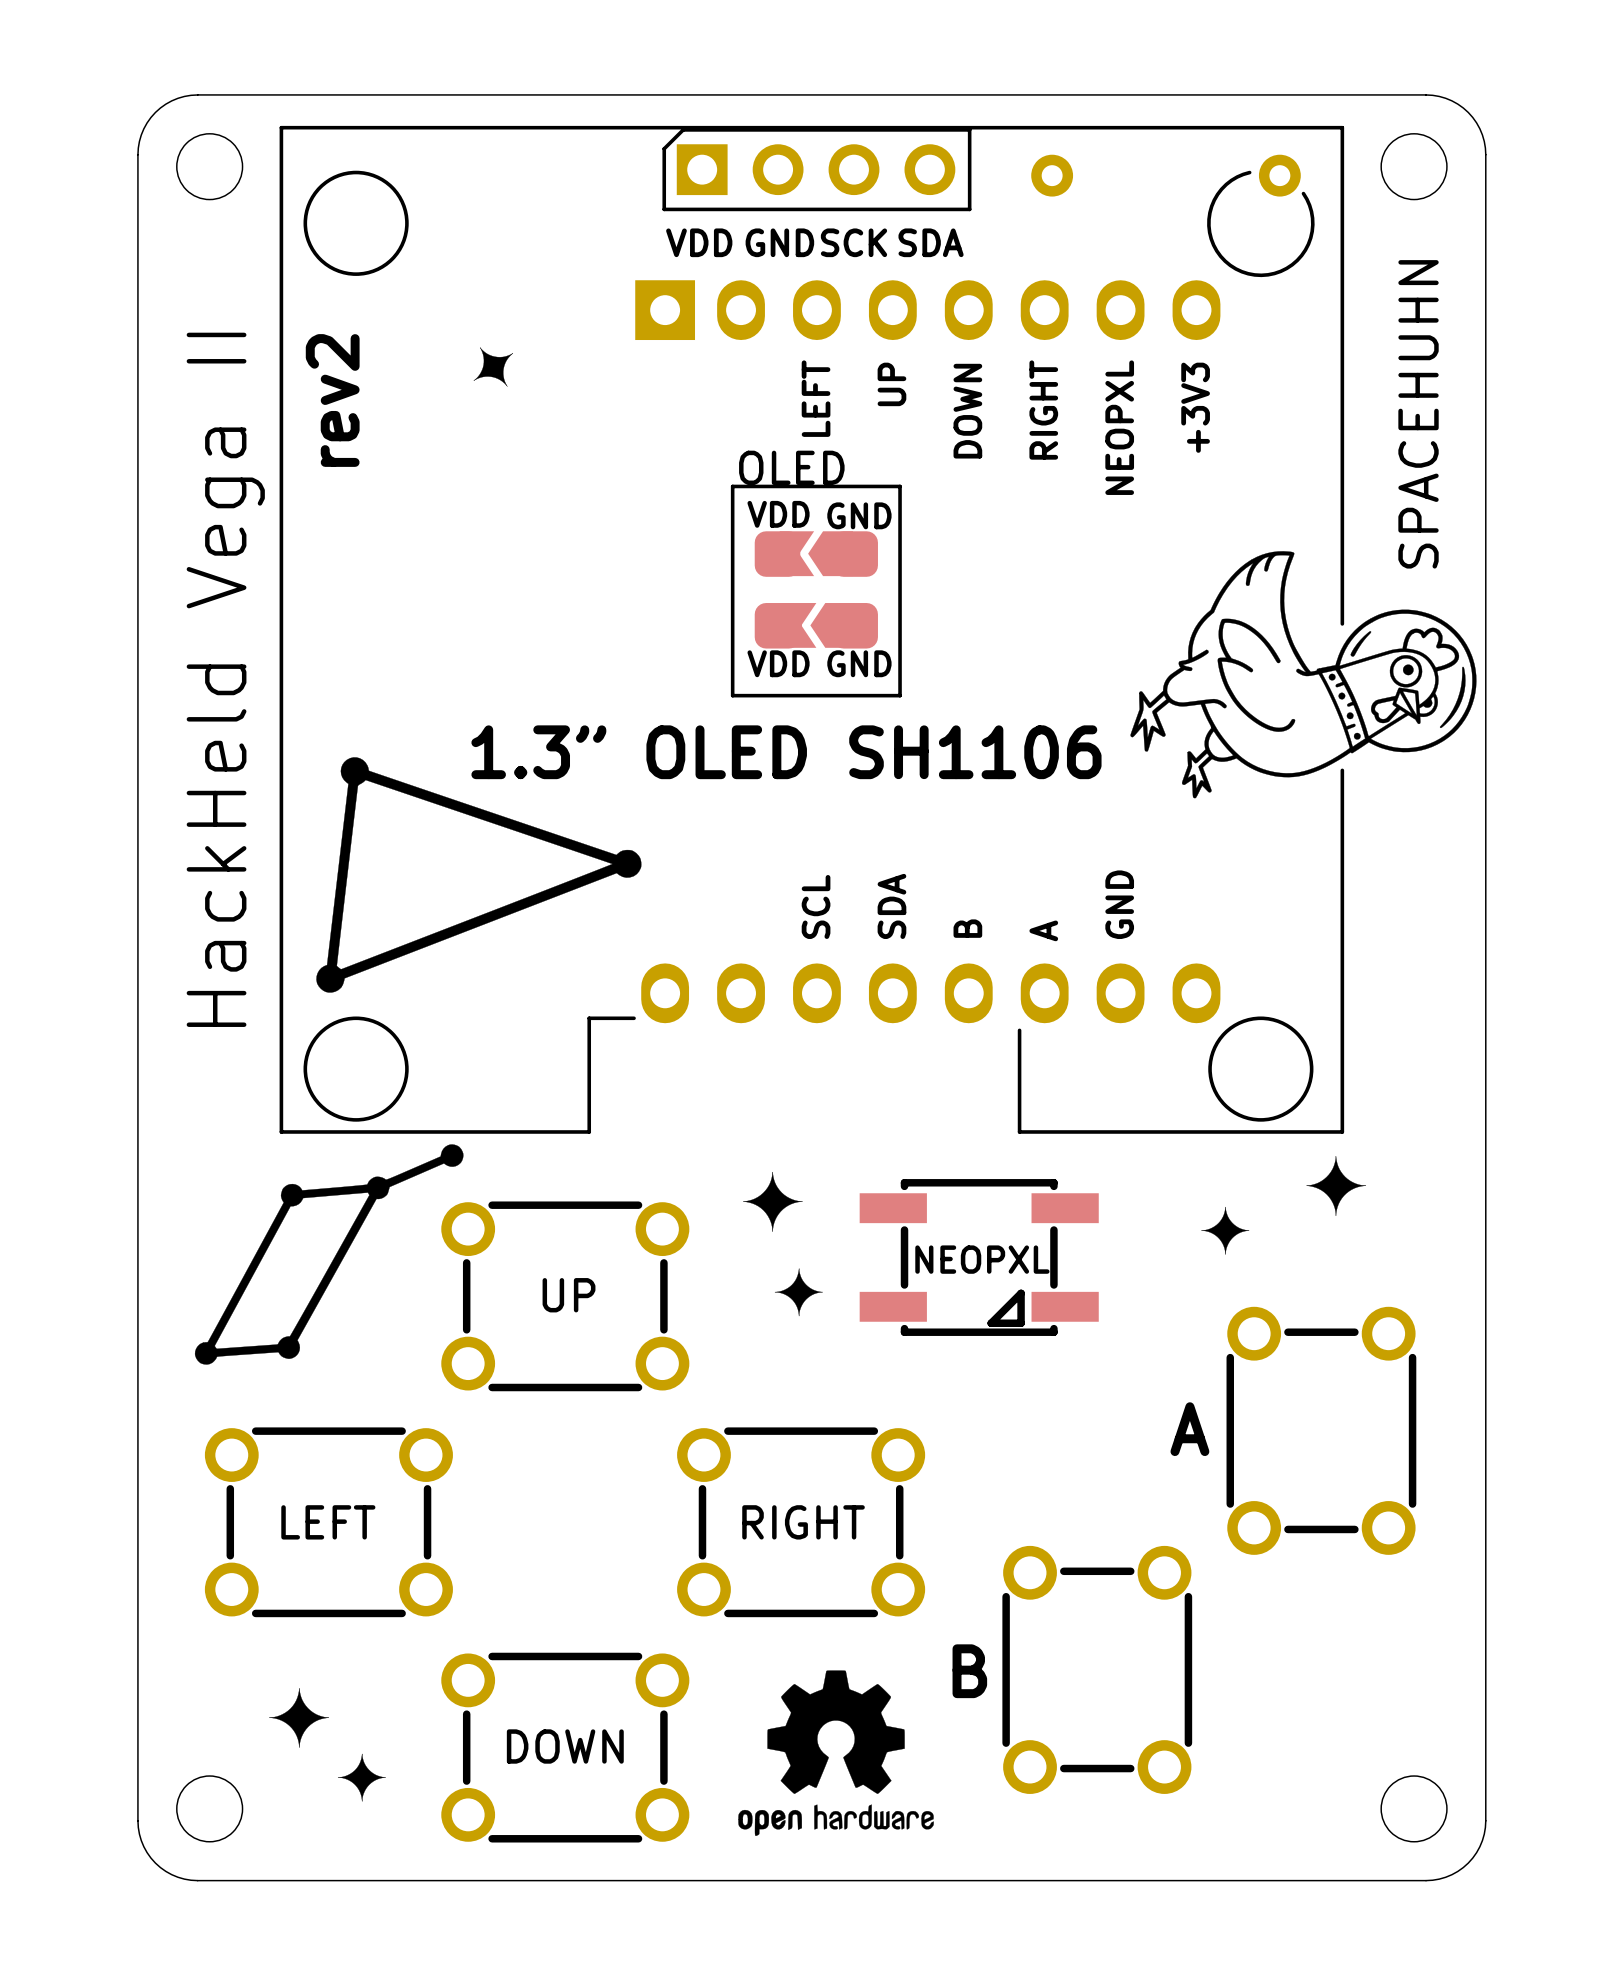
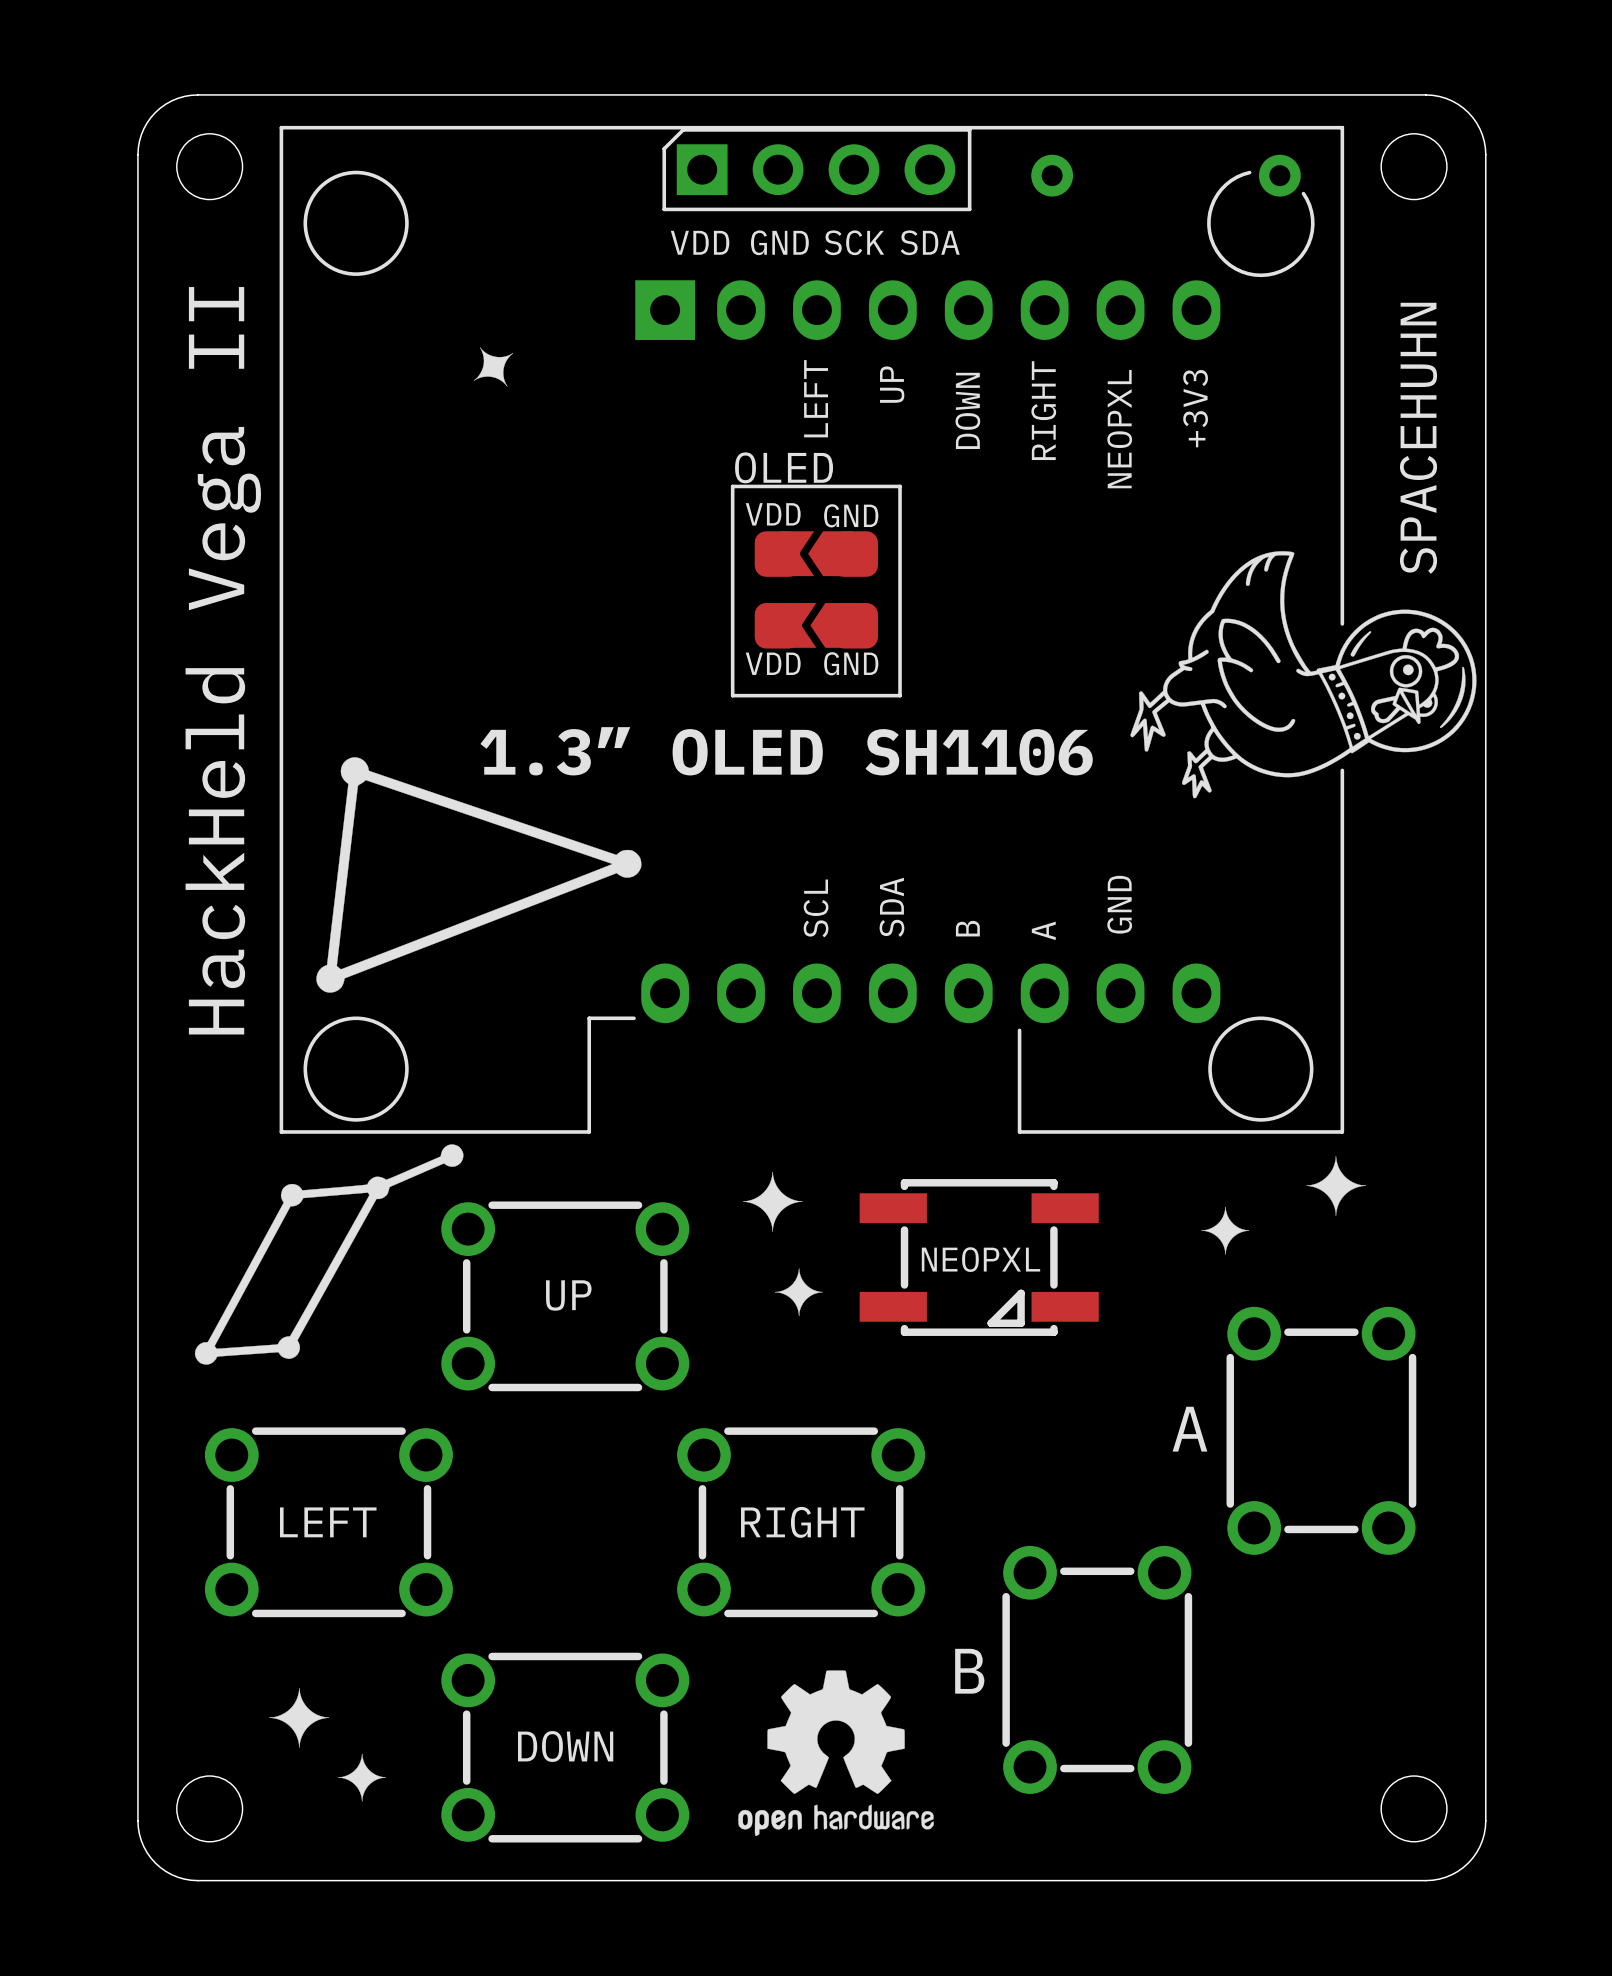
text: rev2 (332, 400) -> none

